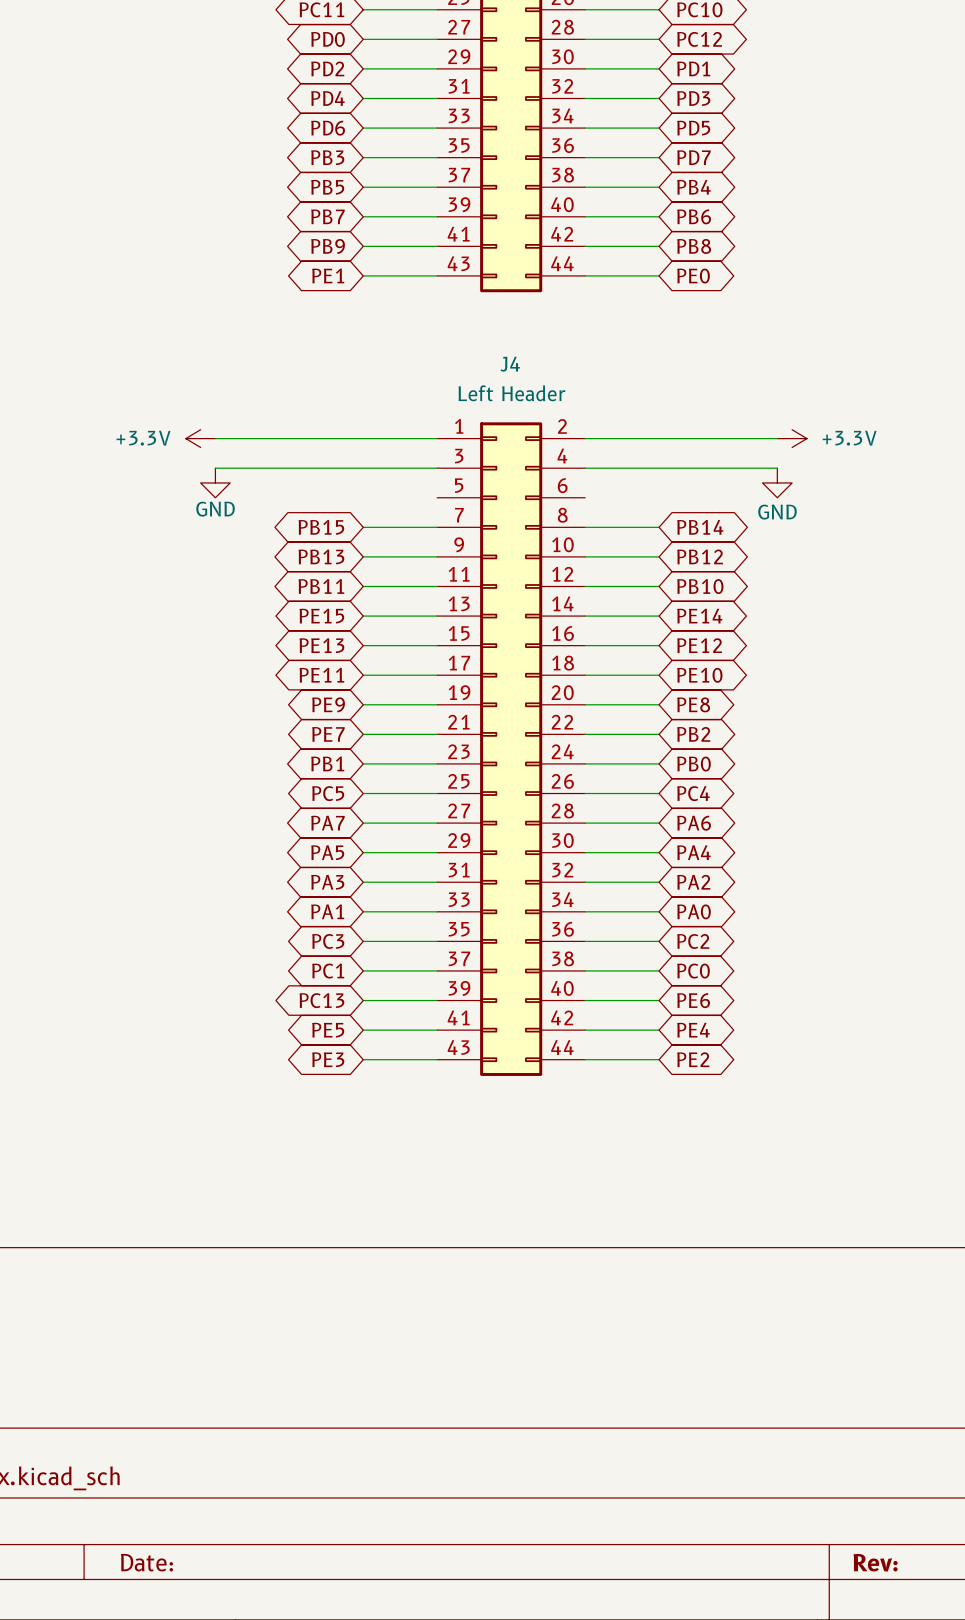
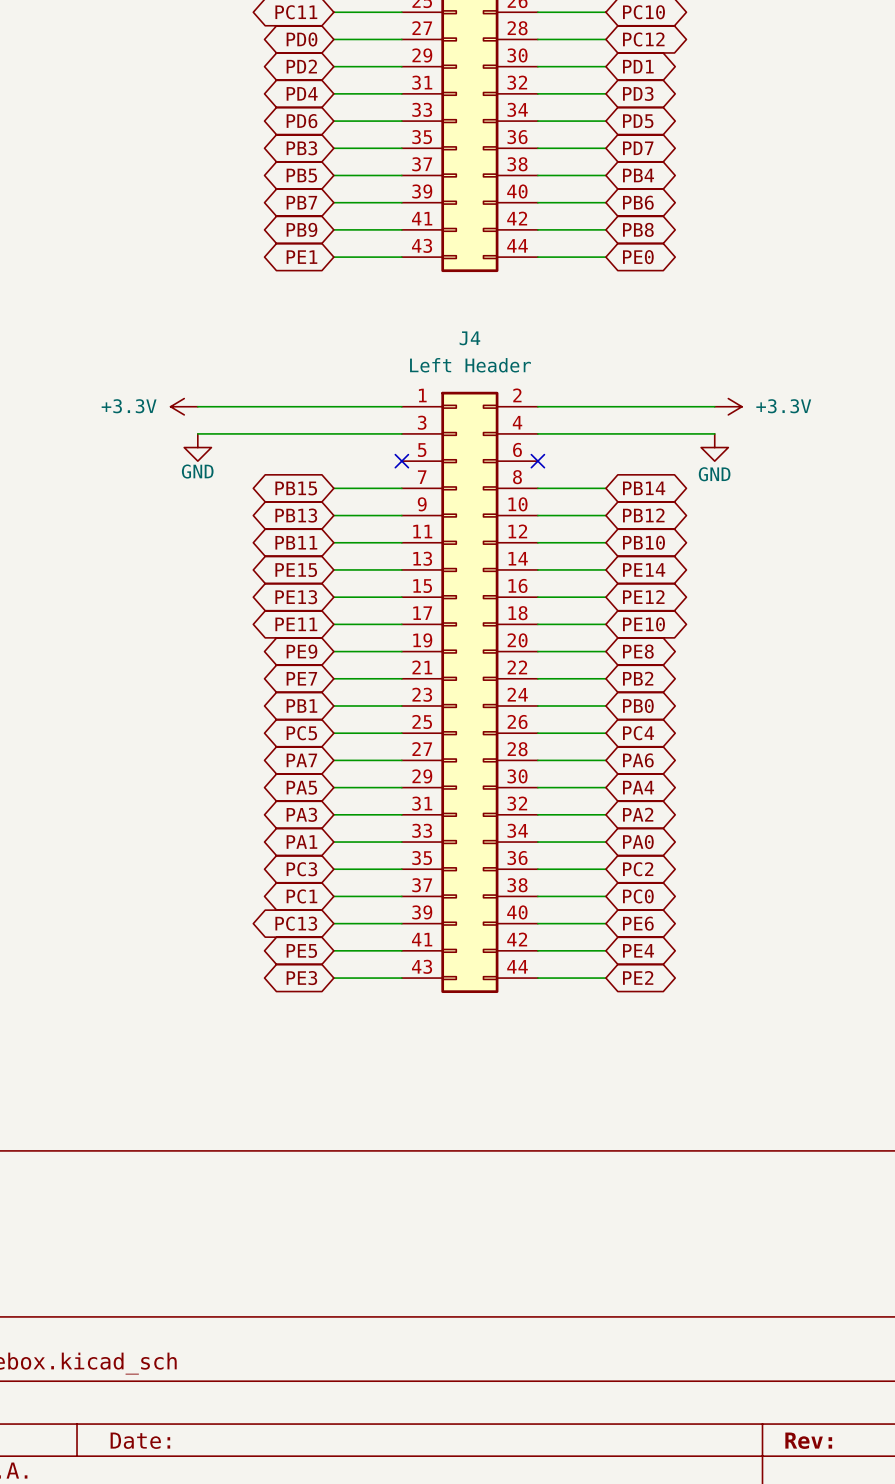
no-connect mark: none -> (401, 461)
no-connect mark: none -> (537, 461)

